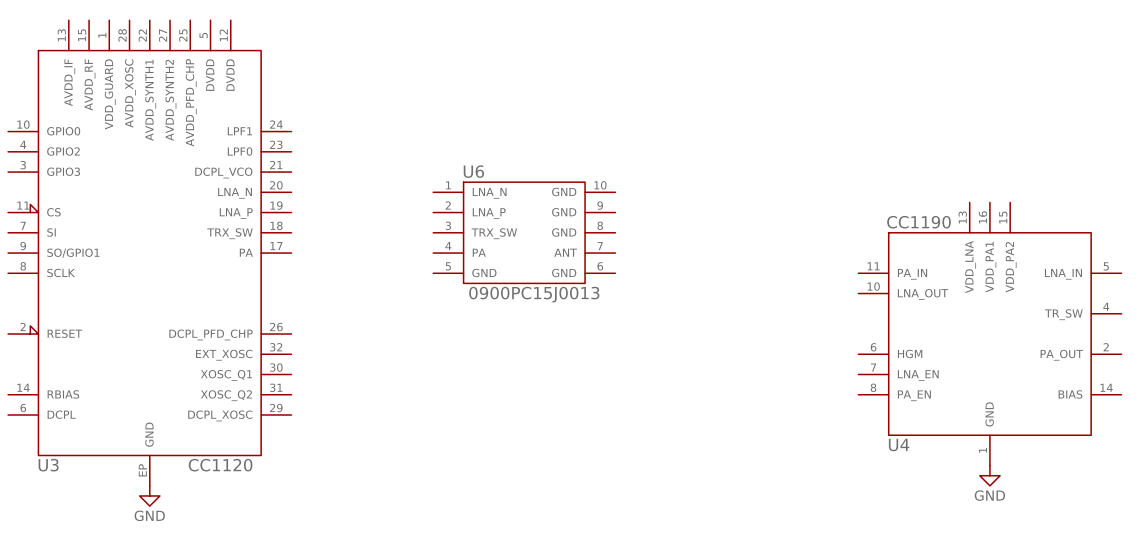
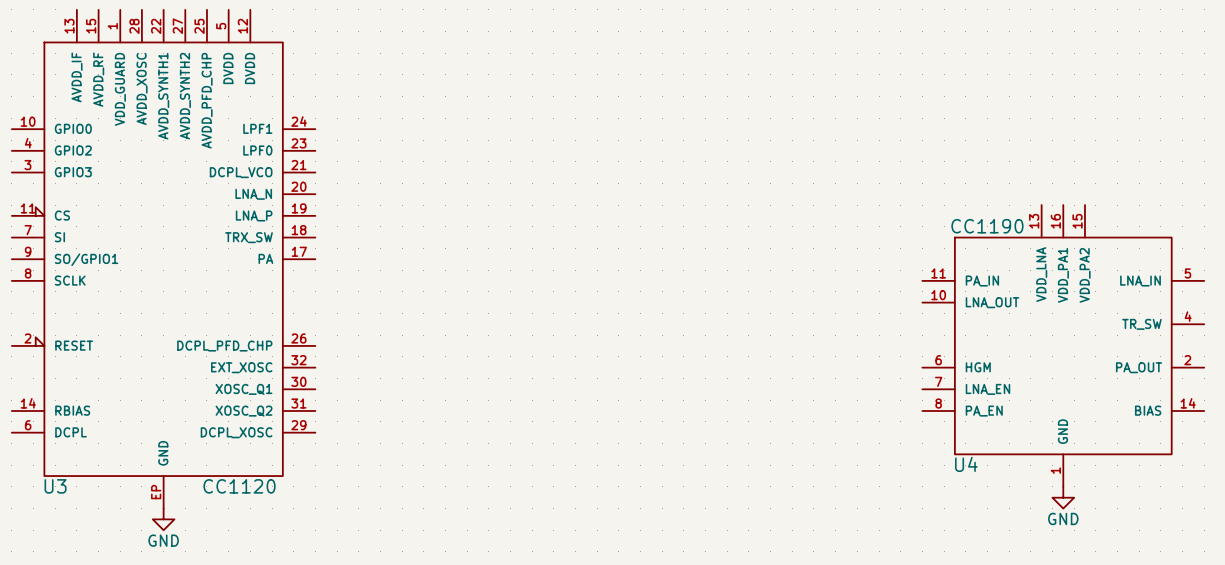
U6: 0900PC15J0013 (524, 232) -> none

